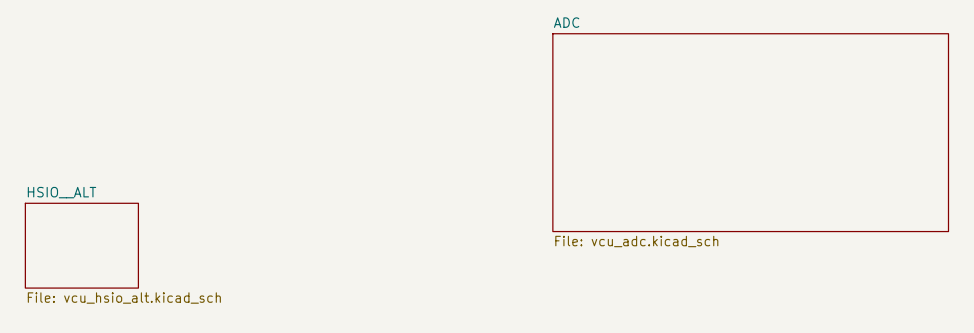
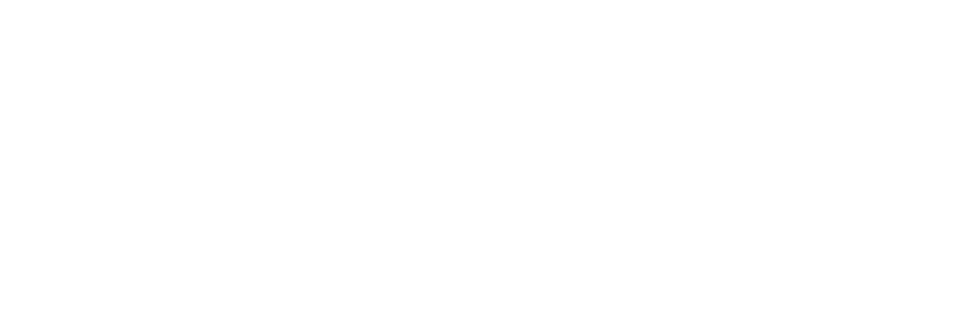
sheet ADC: File: vcu_adc.kicad_sch (750, 132) -> none
sheet HSIO__ALT: File: vcu_hsio_alt.kicad_sch (81, 245) -> none

